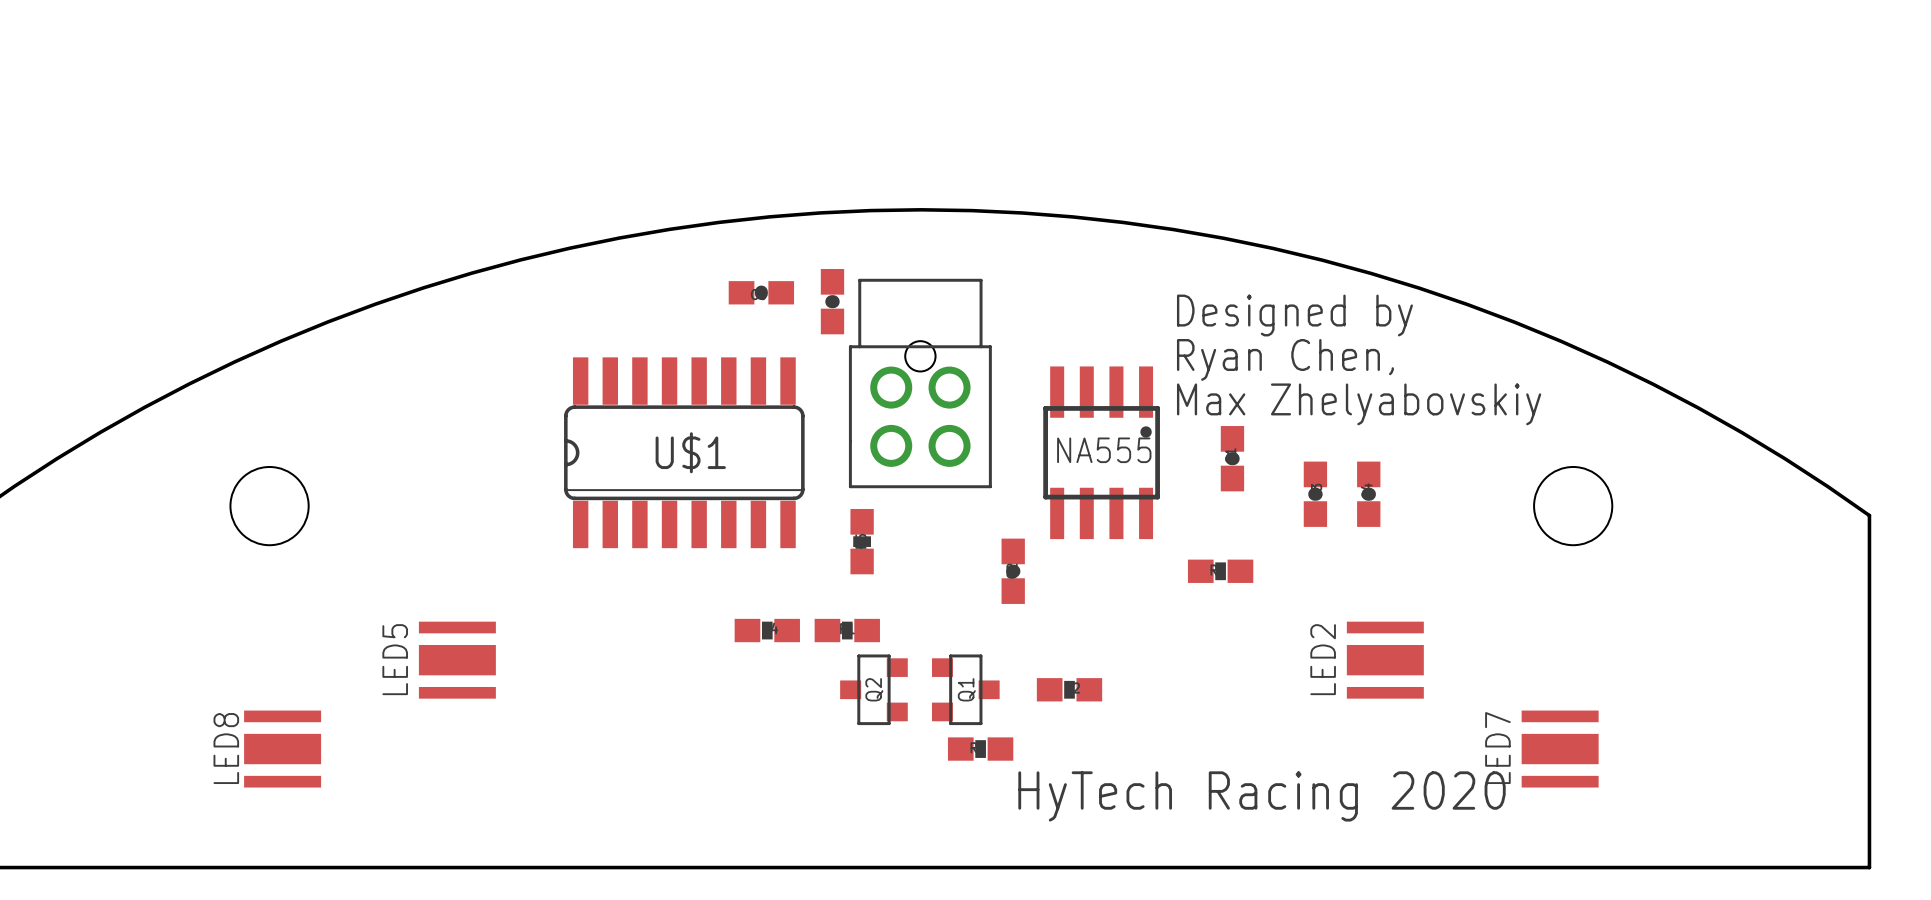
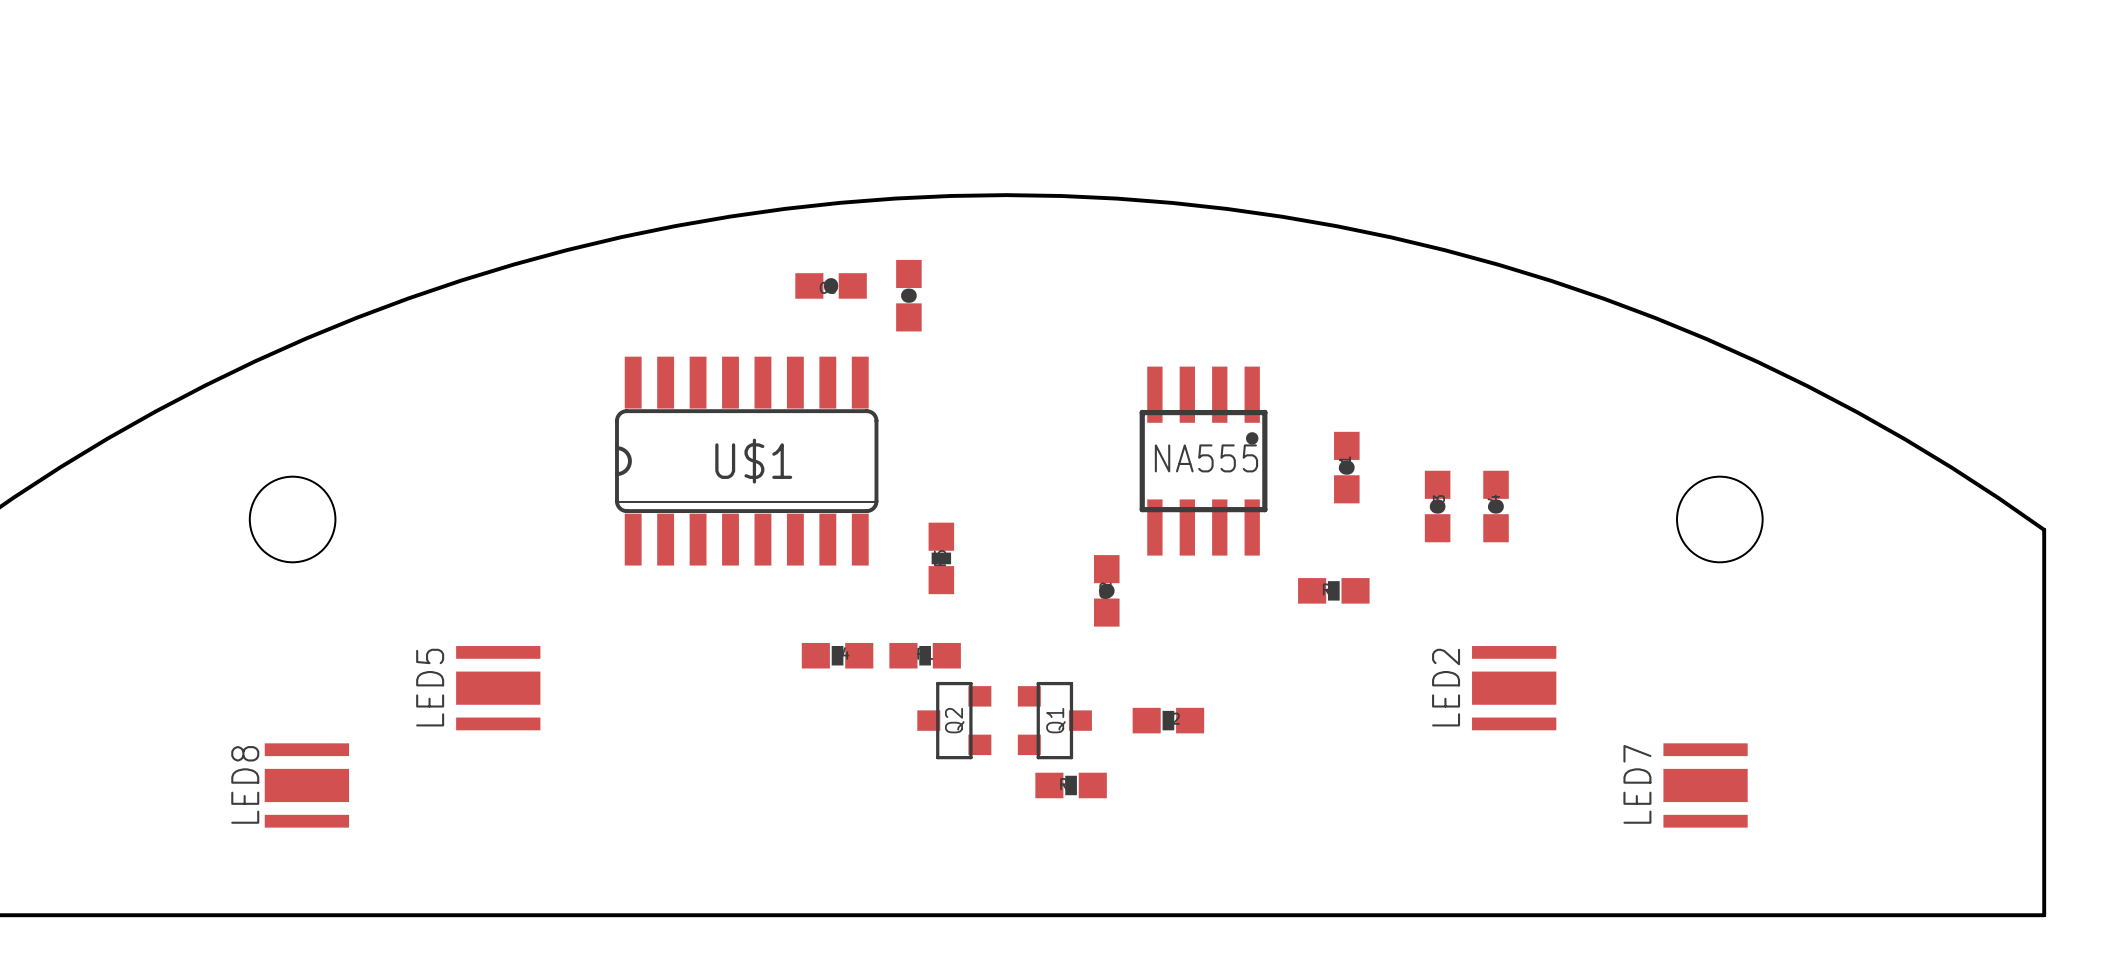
text: Designed by (1294, 315) -> none
text: Ryan Chen, (1285, 359) -> none
part: (920, 383) -> none
text: Max Zhelyabovskiy (1359, 404) -> none
text: HyTech Racing 2020 (1262, 796) -> none

